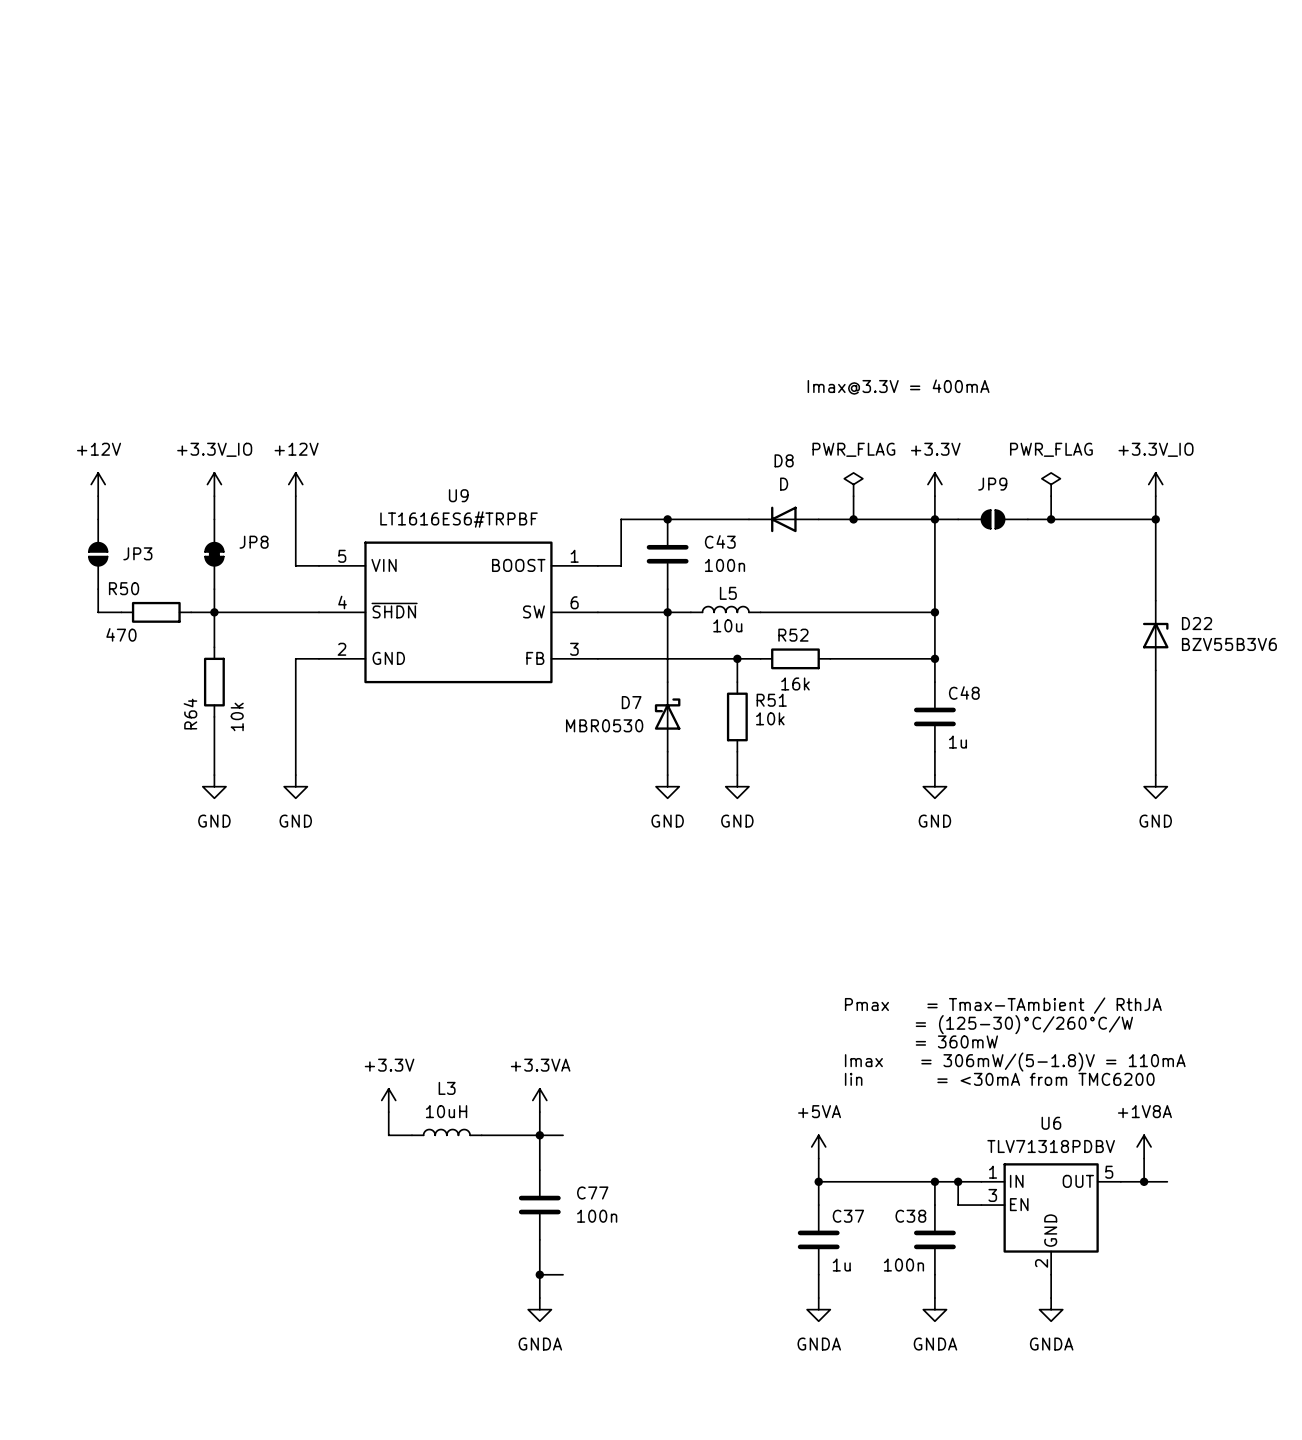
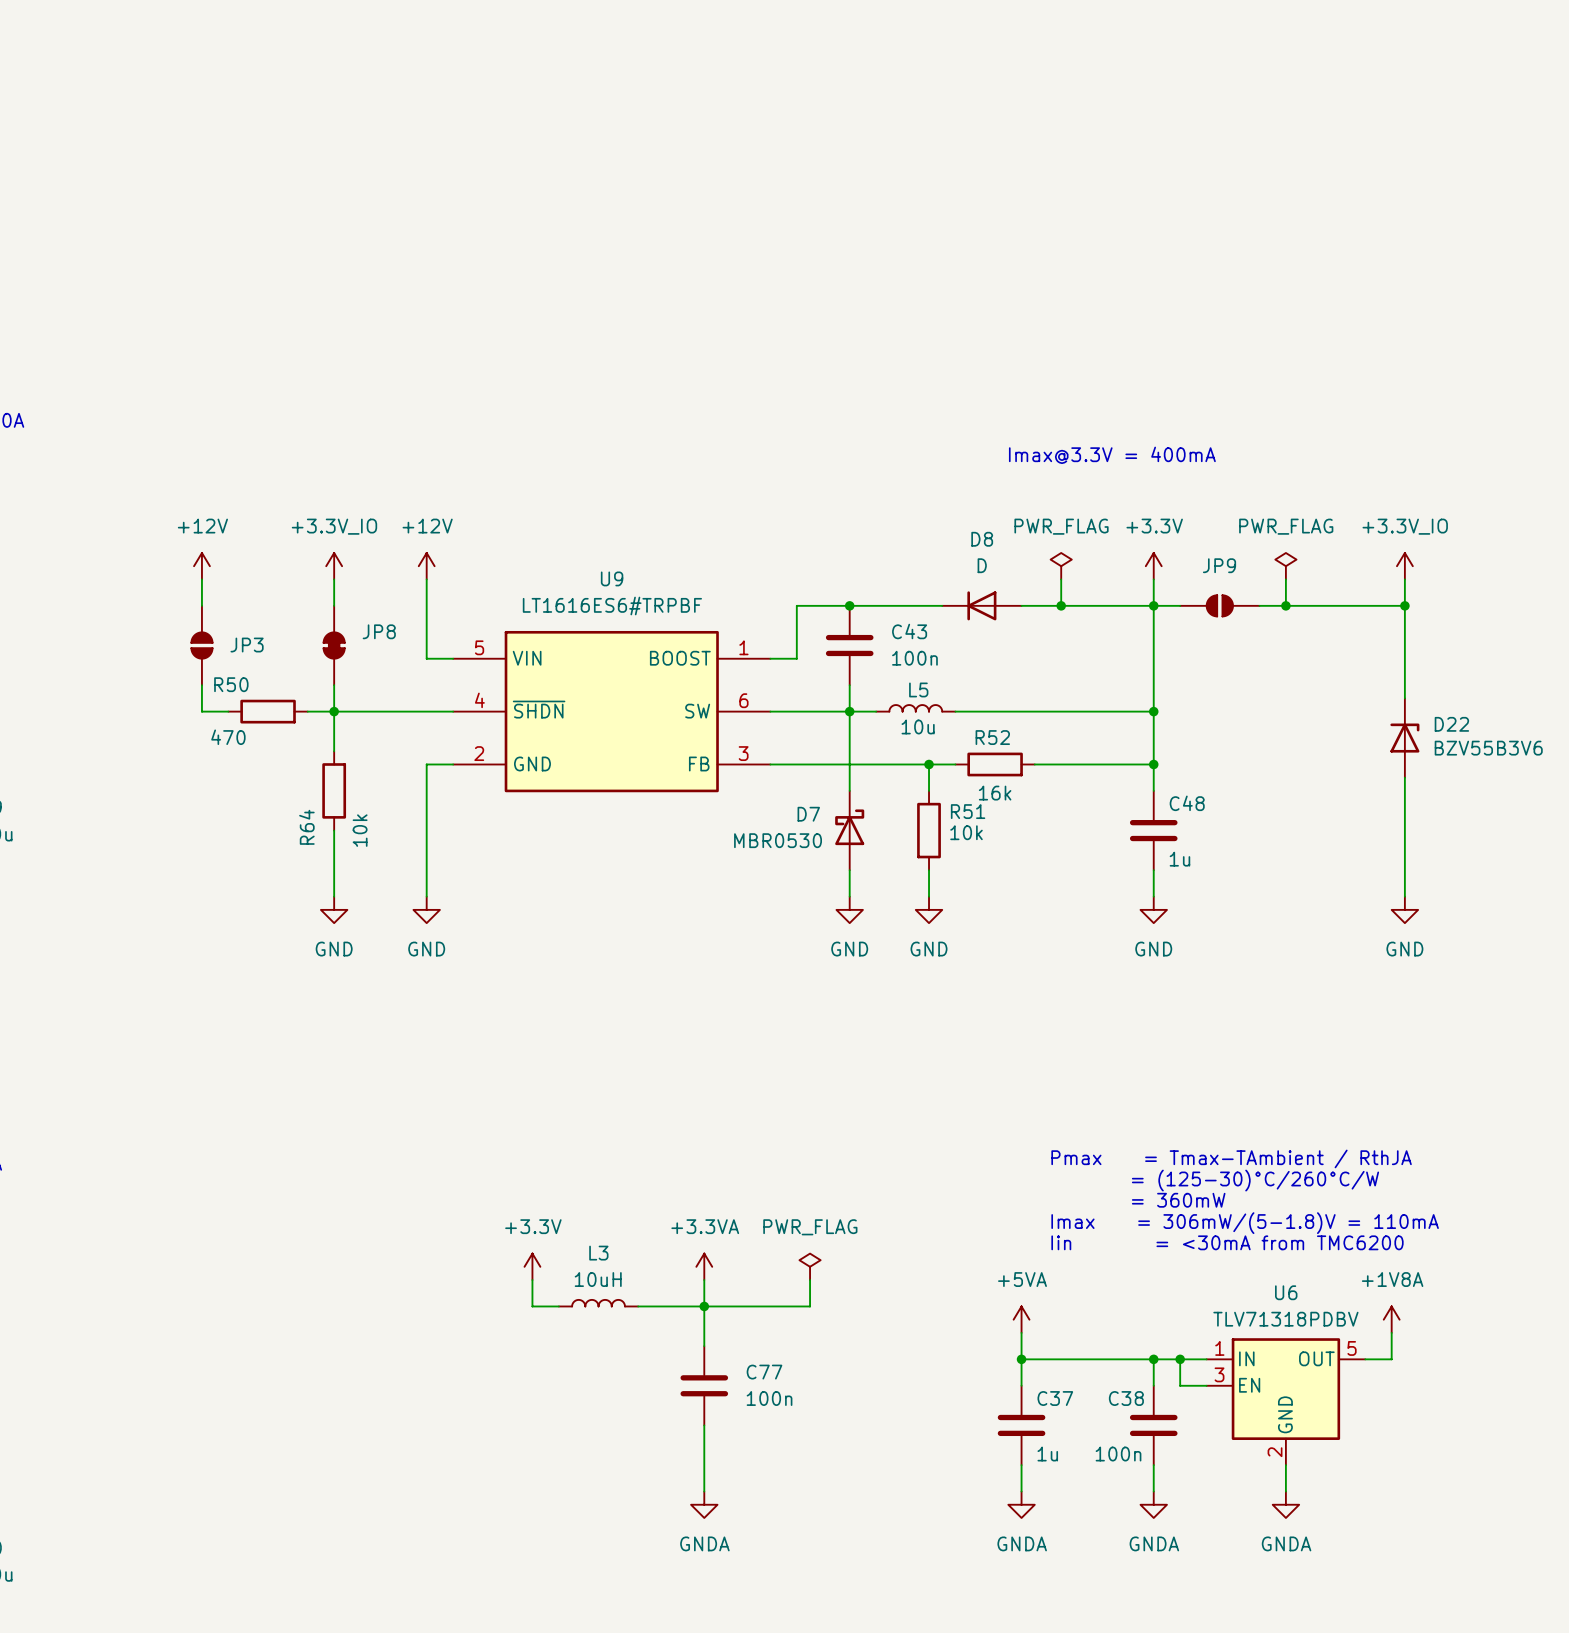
power symbol: none -> PWR_FLAG (810, 1266)
wire: none -> (810, 1280) (810, 1306) (730, 1306)
wire: (1144, 1181) (1167, 1181) -> none
junction: (1144, 1181) -> none
wire: (539, 1274) (563, 1274) -> none
junction: (539, 1274) -> none

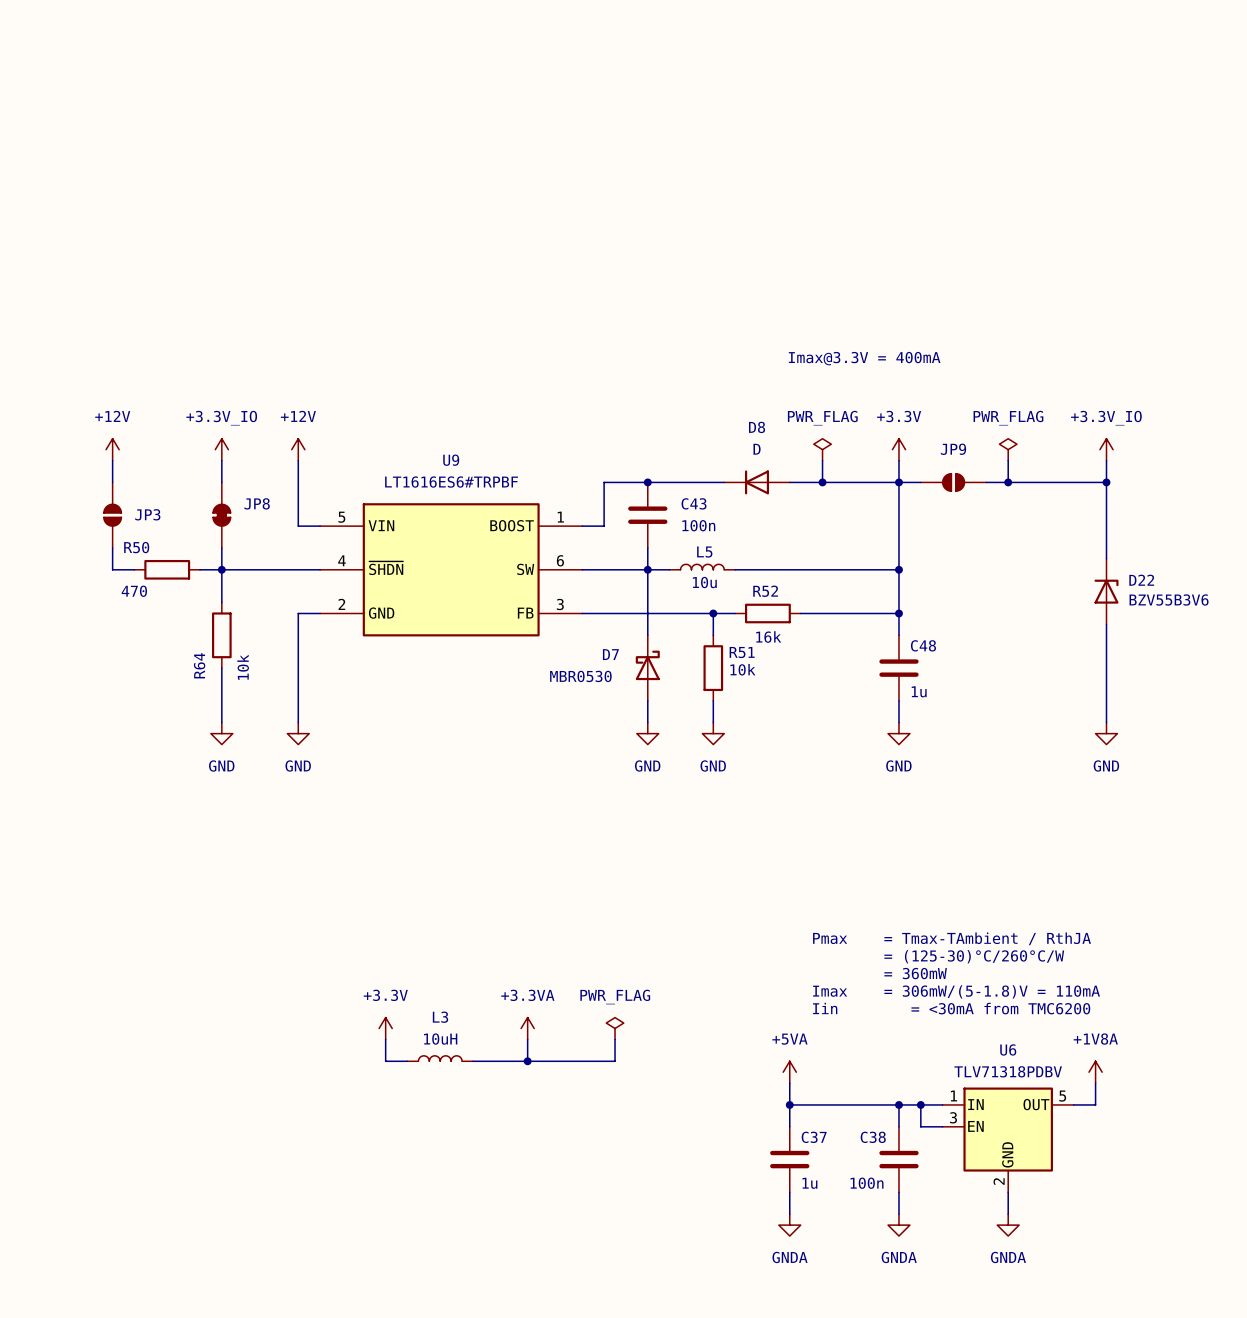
wire: (704, 1306) (704, 1346) -> none
C77: 100n (704, 1385) -> none
wire: (704, 1425) (704, 1491) -> none
power symbol: GNDA (704, 1504) -> none

